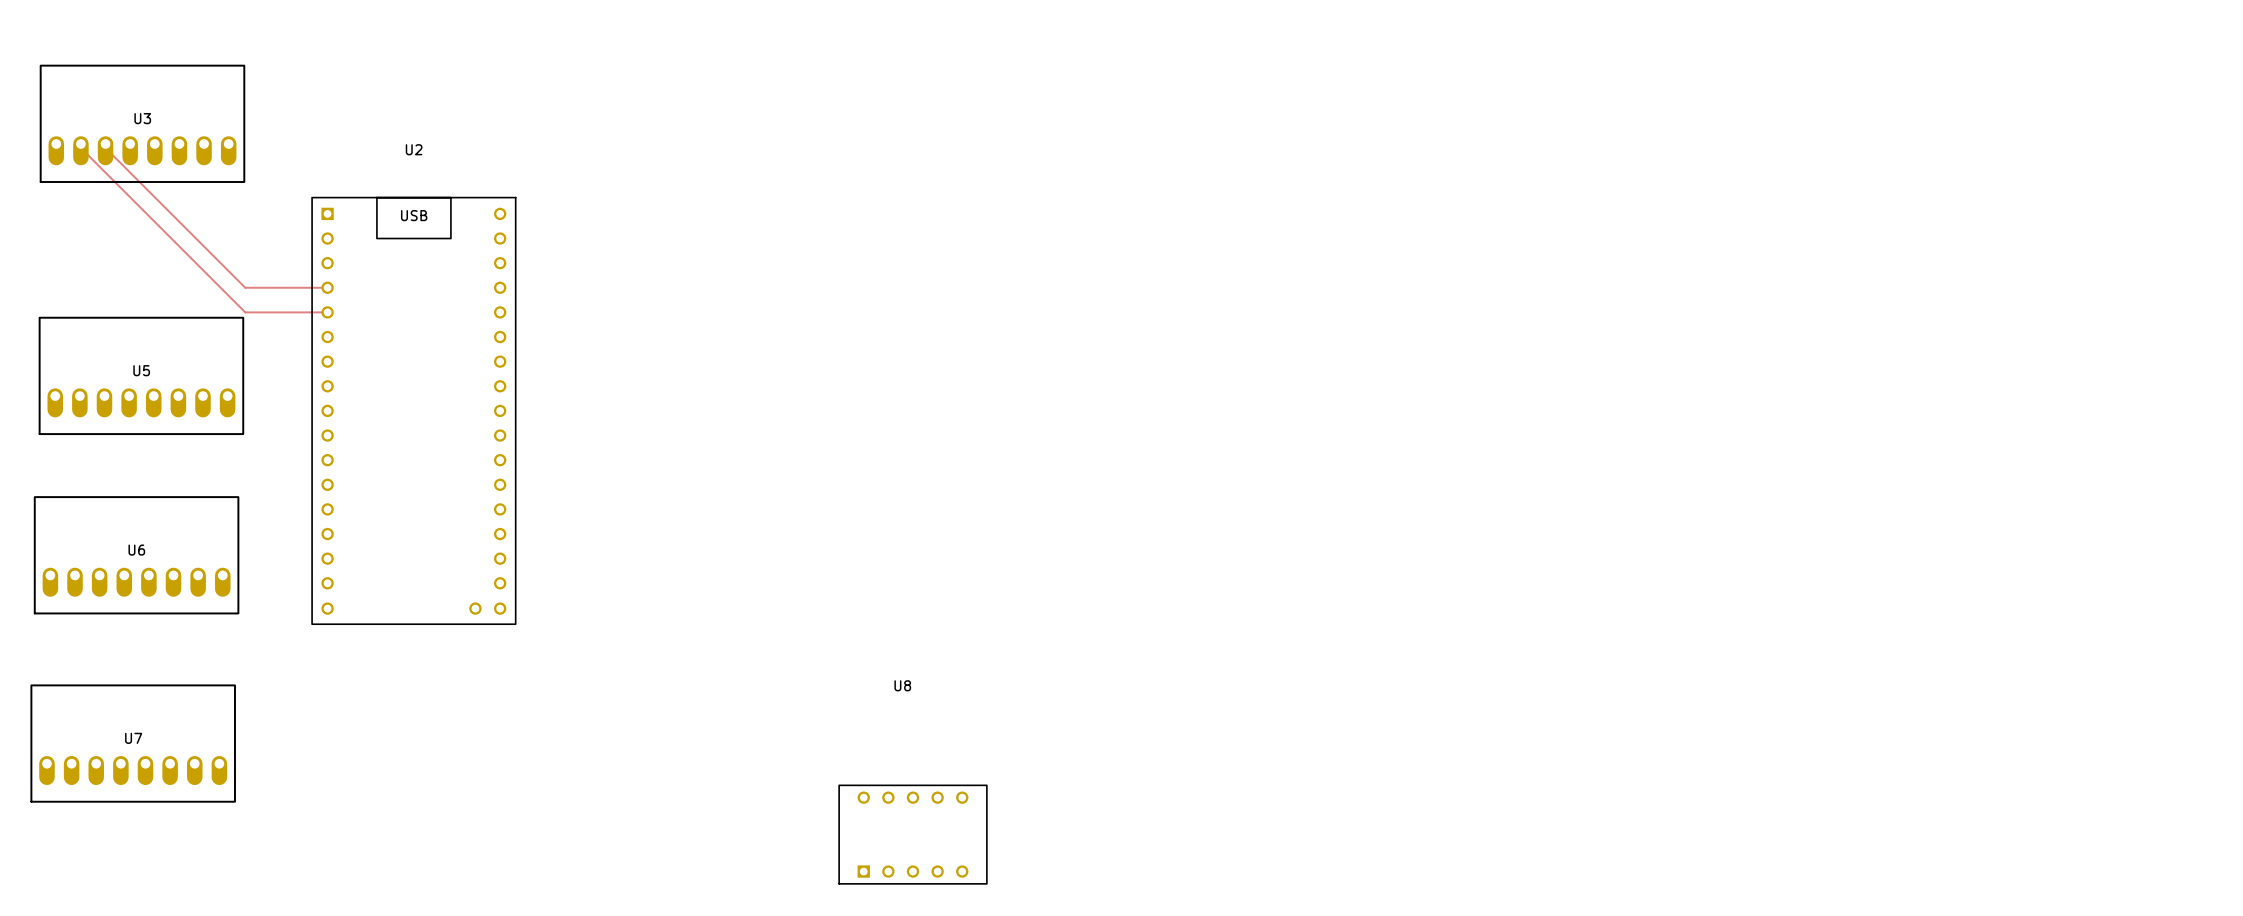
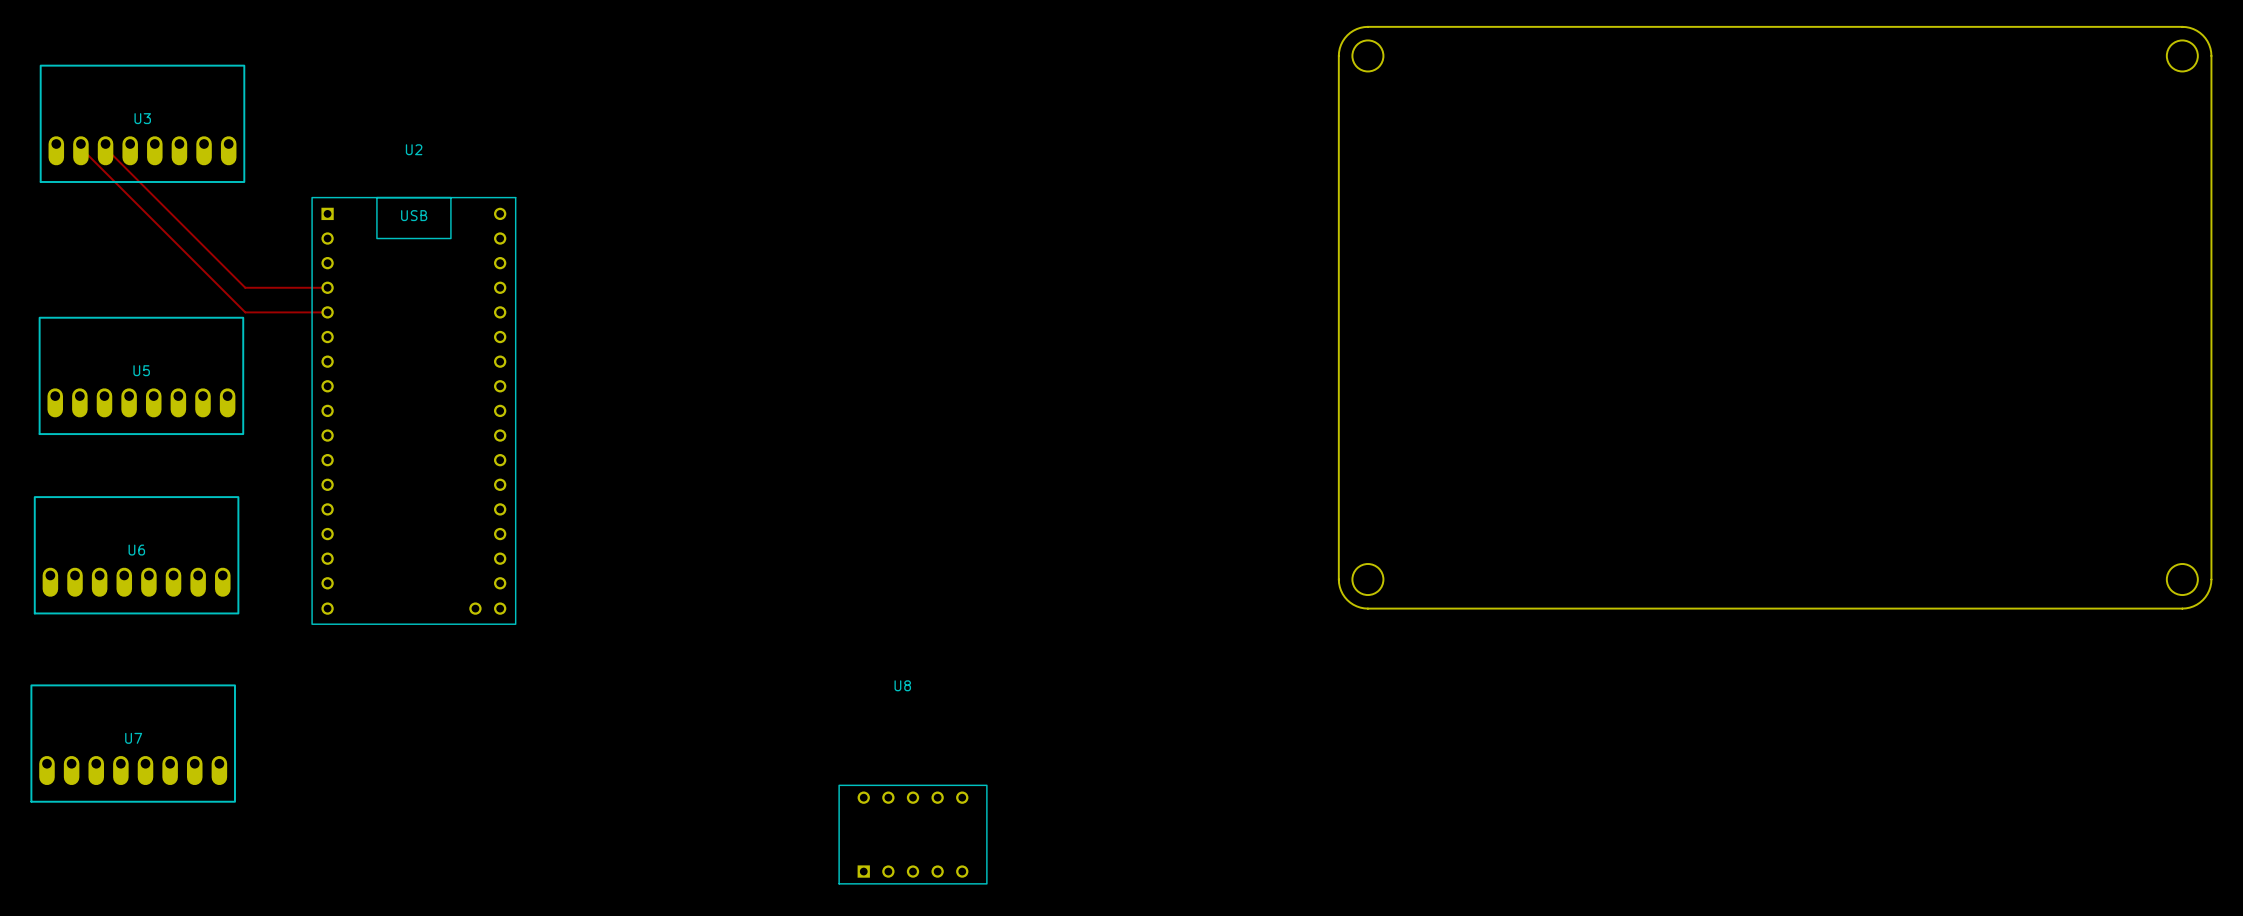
board edge: none -> (1367, 26) (2182, 26) (2200, 32) (2209, 44) (2211, 55) (2211, 579) (2205, 597) (2193, 606) (2182, 608) (1367, 608) (1350, 602) (1341, 590) (1338, 579) (1338, 55) (1341, 44) (1347, 35) (1356, 29) (1367, 26)
round board edge: none -> [1351, 39, 1385, 73]
round board edge: none -> [2165, 39, 2199, 73]
round board edge: none -> [1351, 563, 1385, 596]
round board edge: none -> [2165, 563, 2199, 596]

